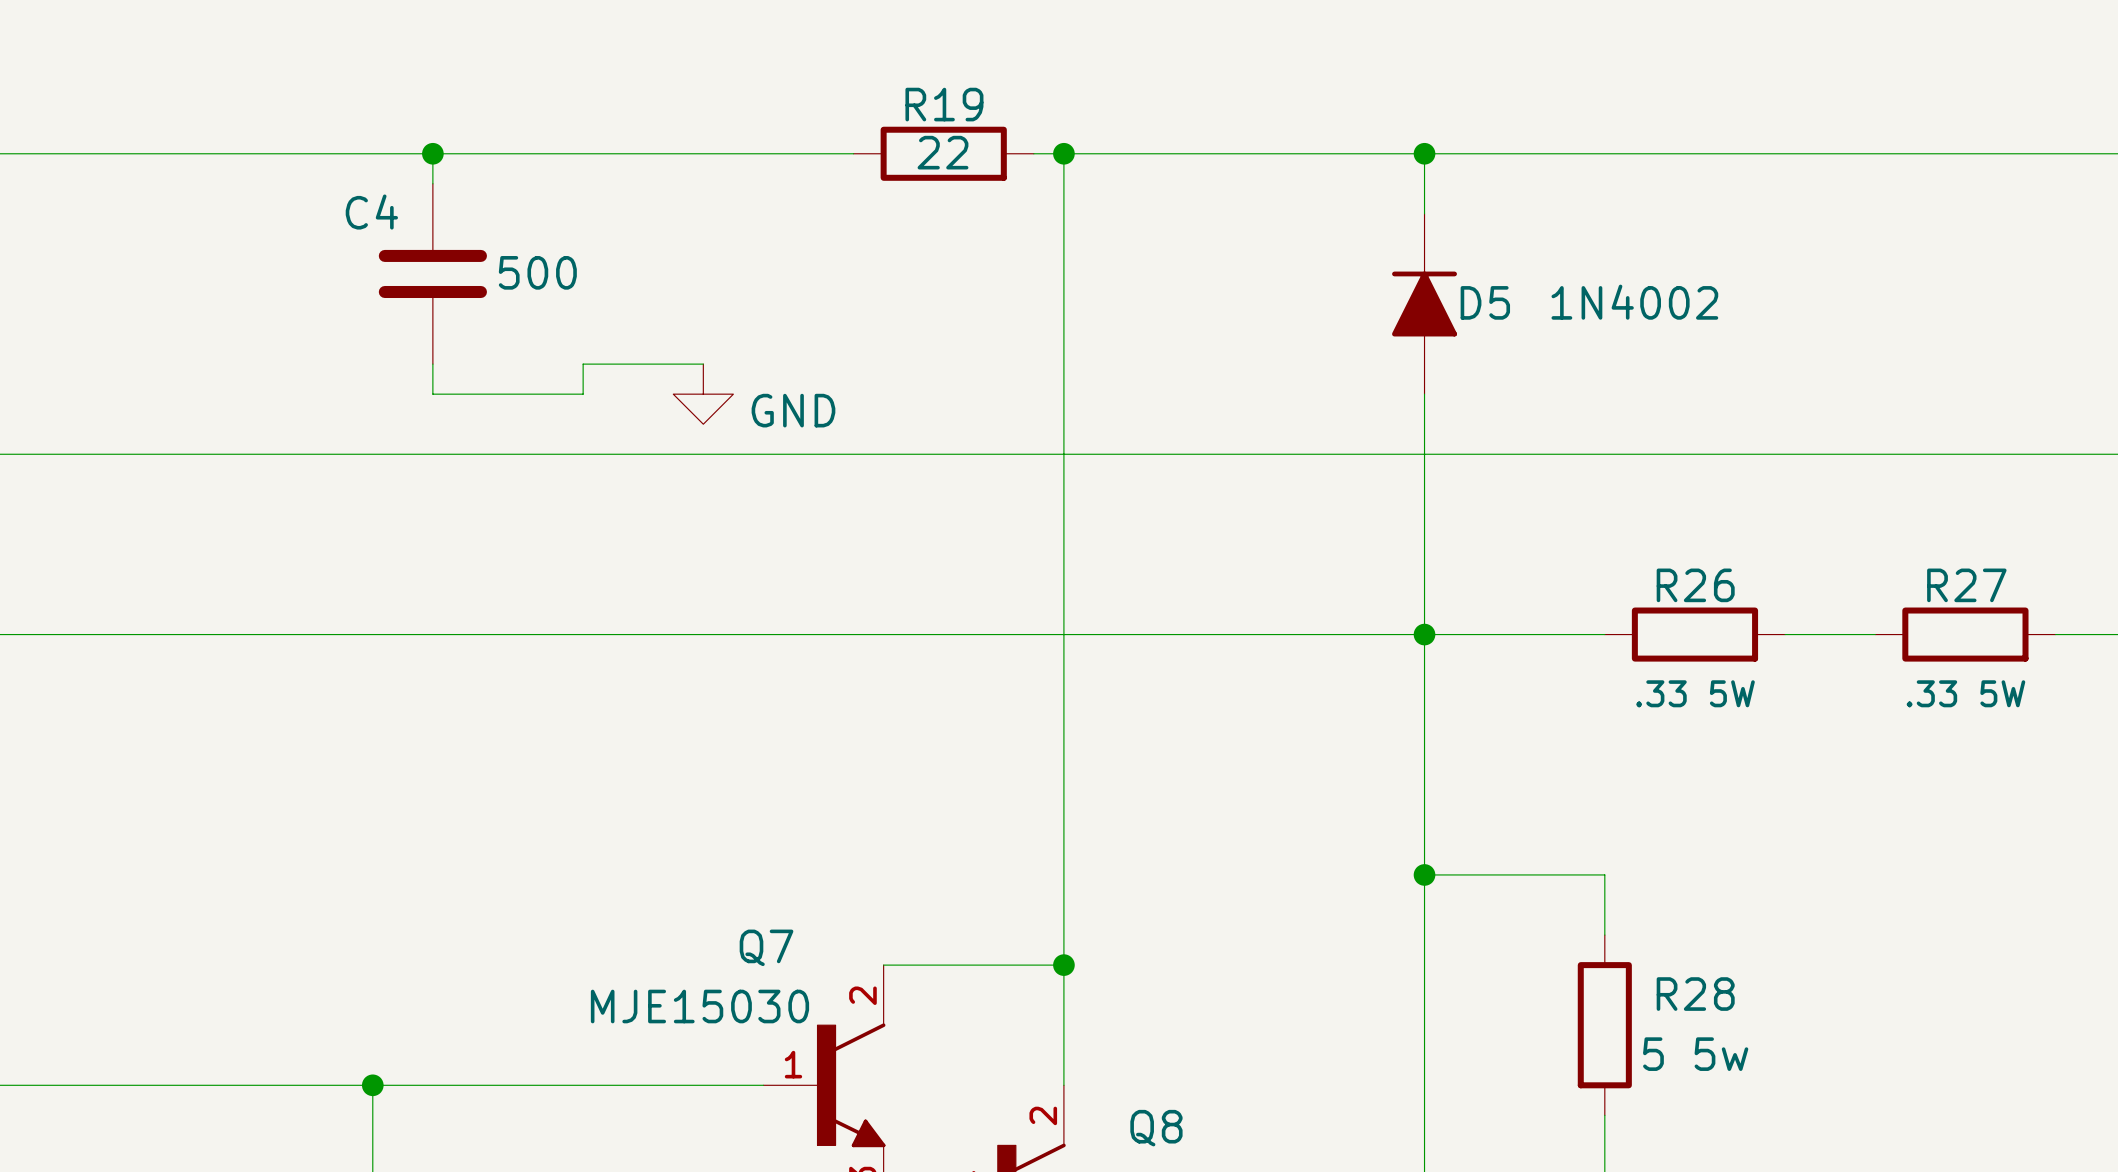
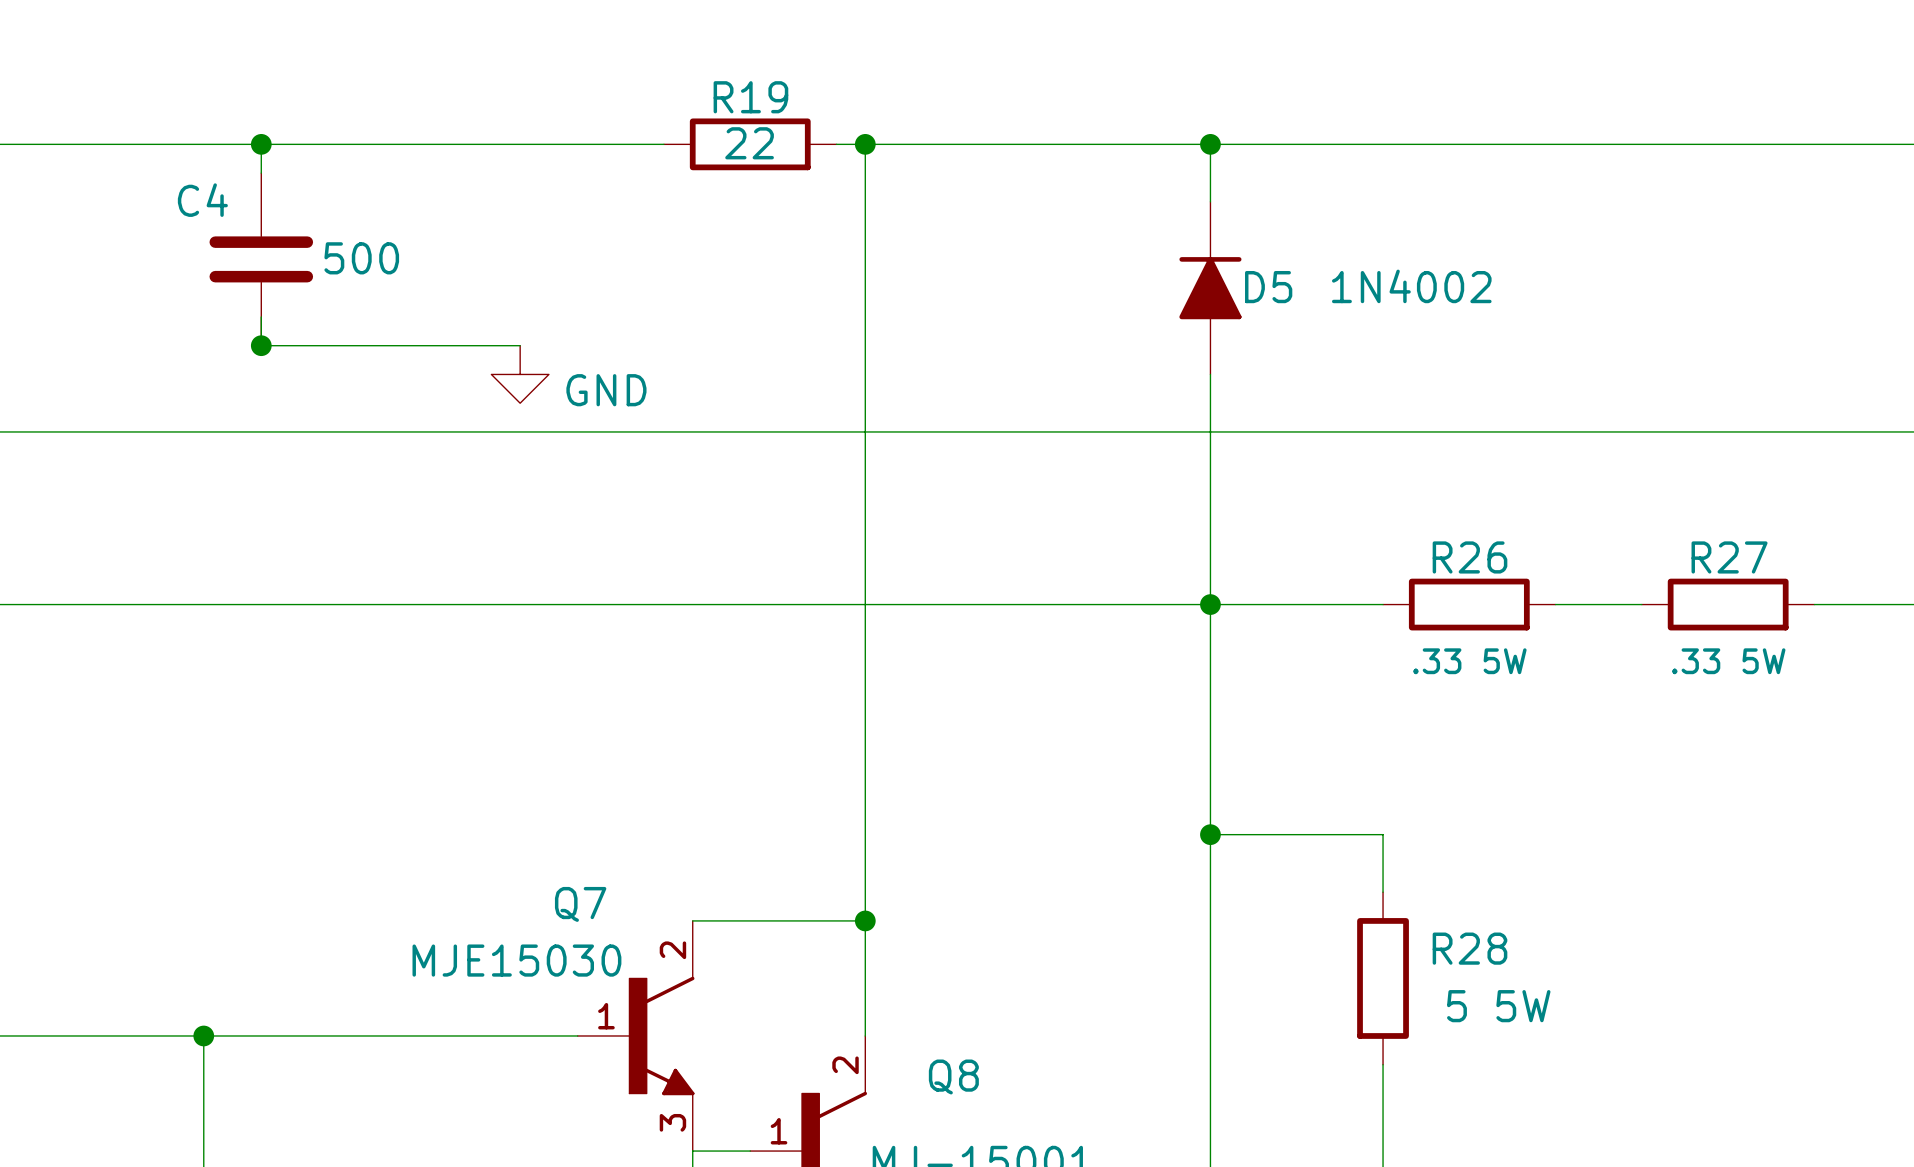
wire: (432, 364) (432, 394) (583, 394) (583, 364) -> (261, 316) (261, 345) (405, 345)
junction: none -> (261, 345)
R28 value: 5 5w (1695, 1054) -> 5 5W (1498, 1006)

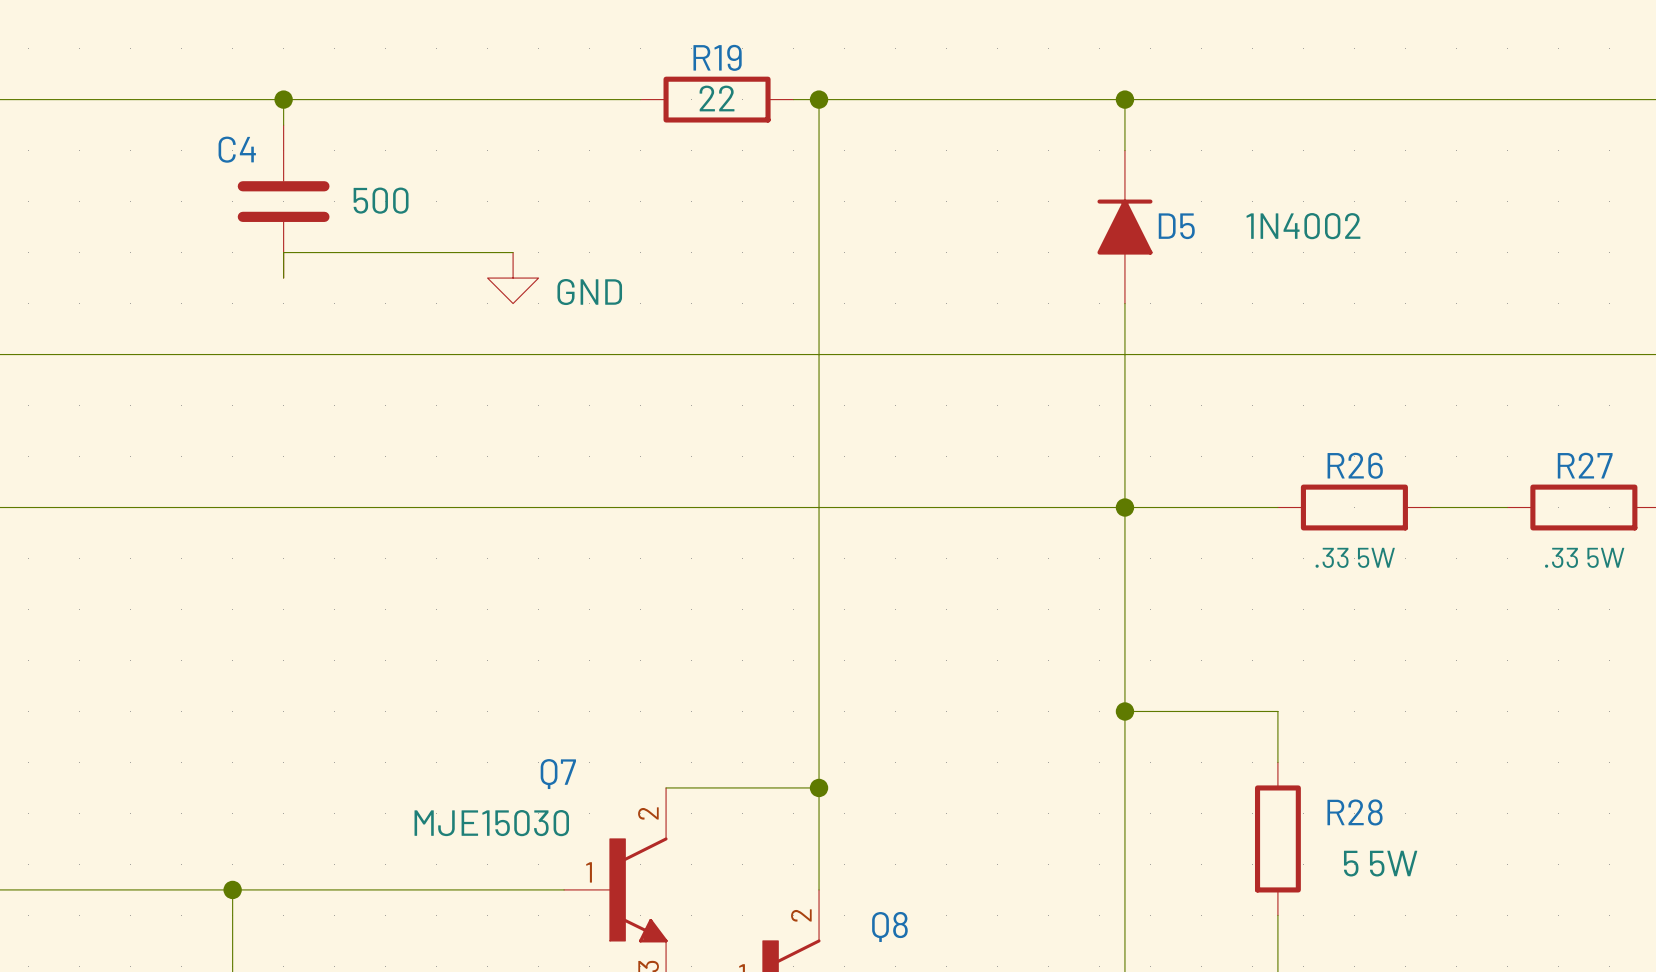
wire: (261, 345) (520, 345) -> (283, 252) (513, 252)
junction: (261, 345) -> none
power symbol position: GND (520, 374) -> GND (513, 278)

